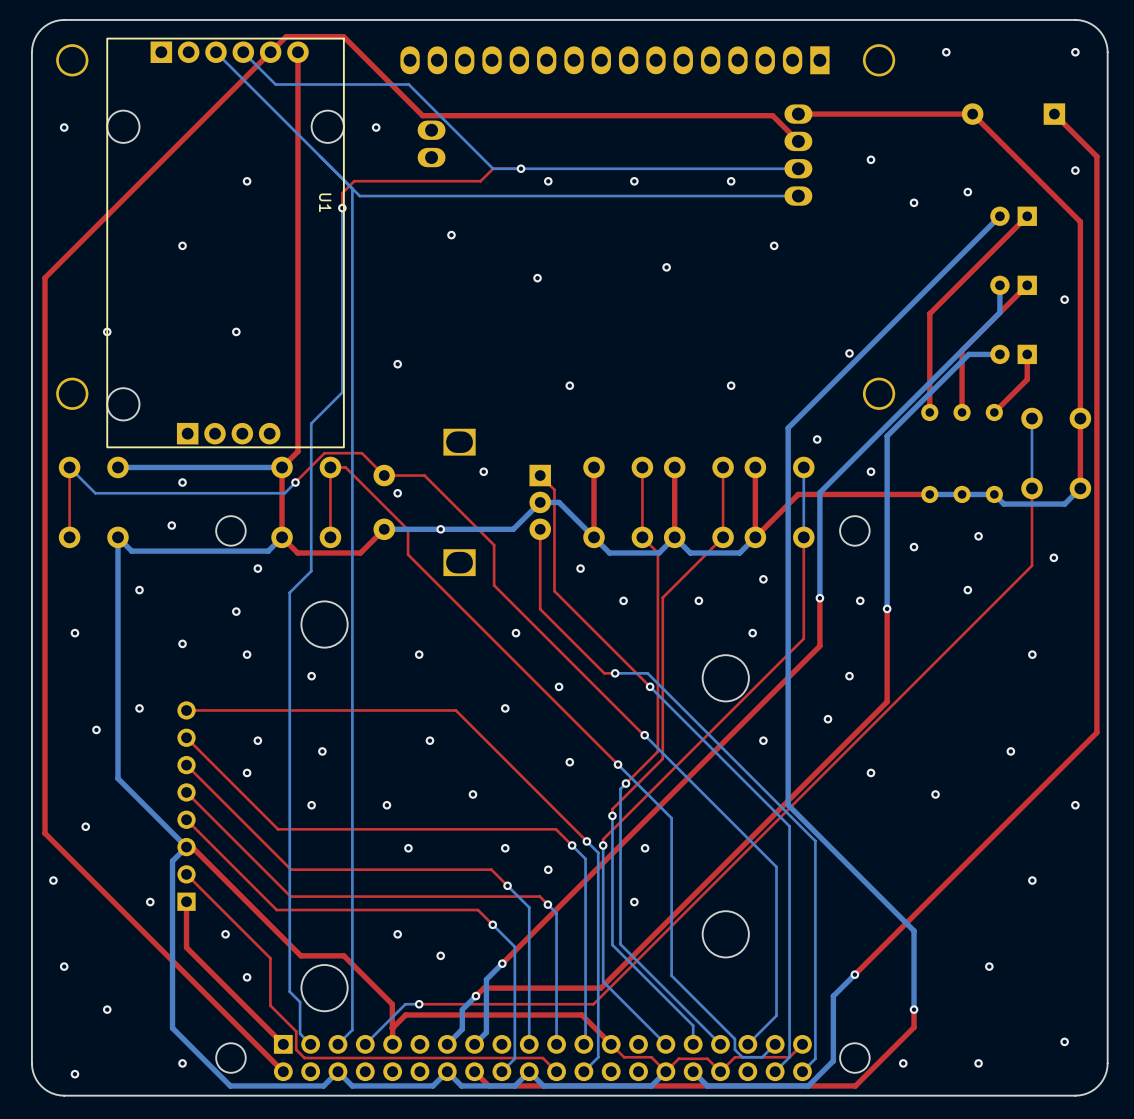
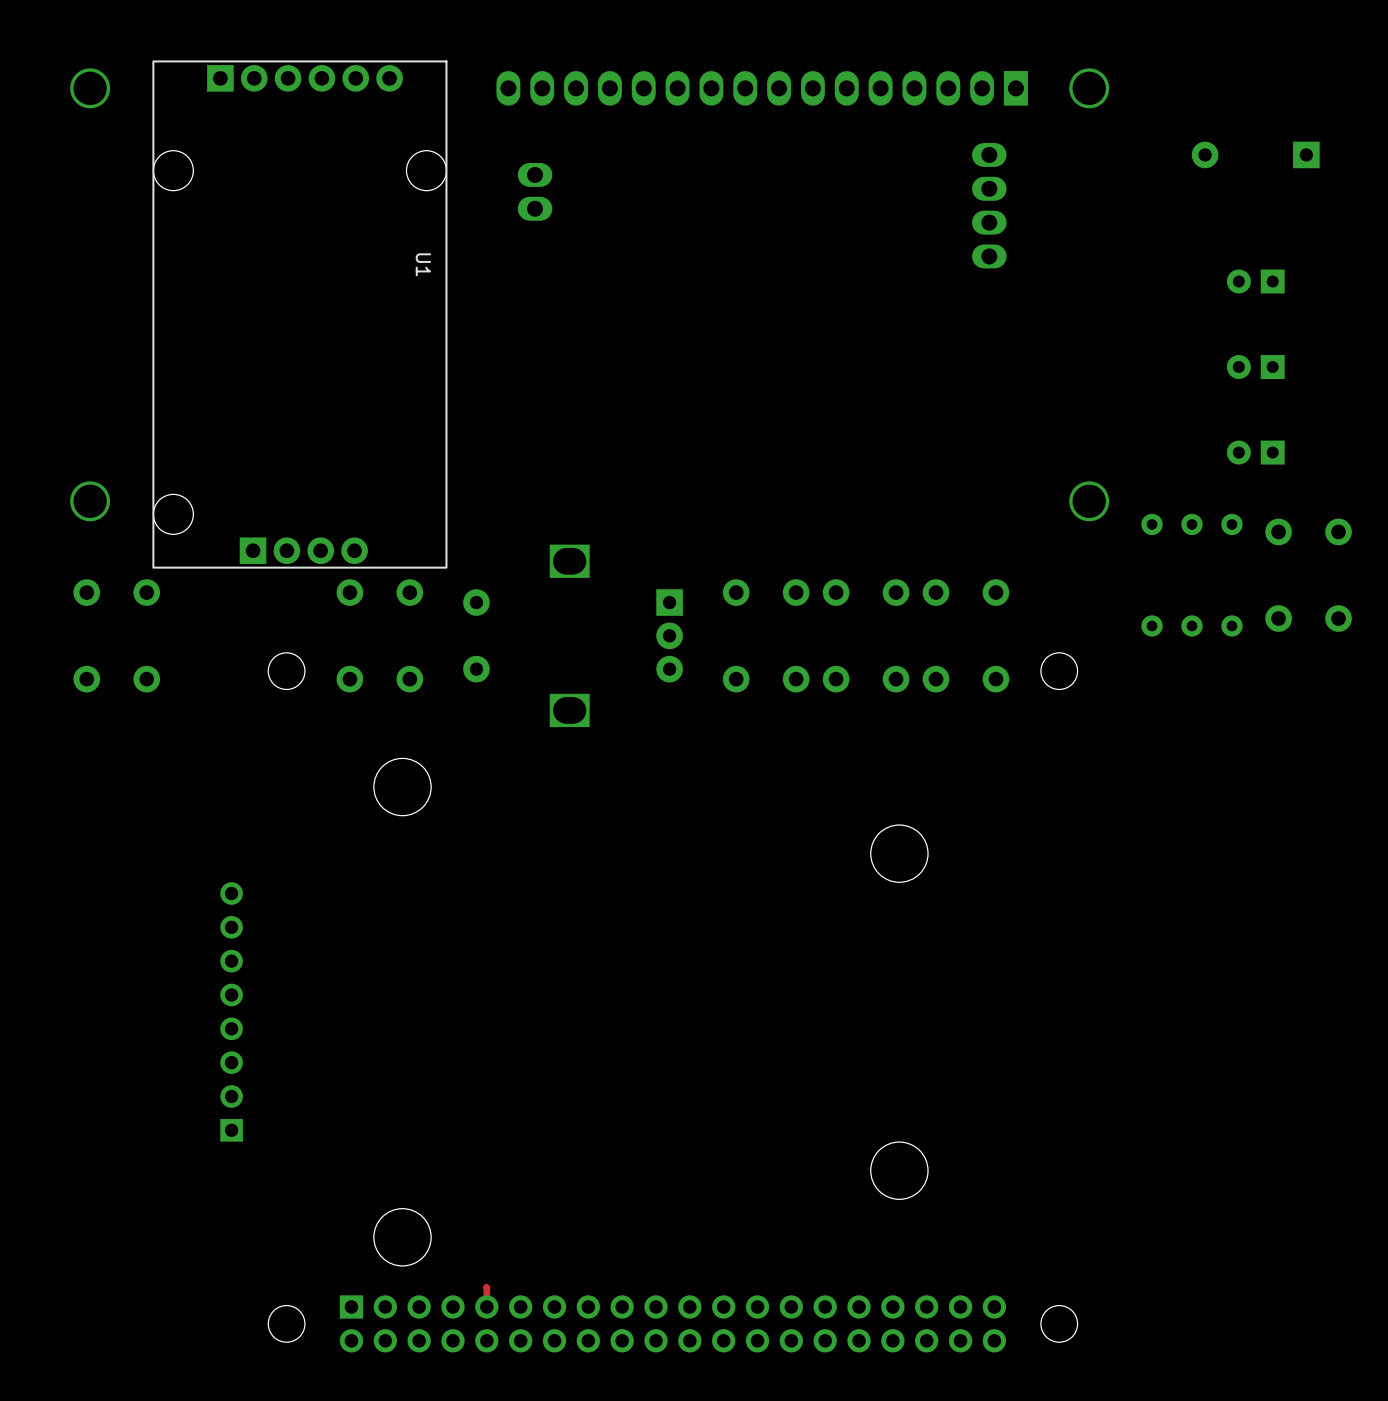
board edge: (1075, 19) (64, 19) (51, 22) (41, 29) (34, 39) (31, 52) (31, 1063) (34, 1075) (41, 1086) (51, 1093) (64, 1095) (1075, 1095) (1087, 1093) (1098, 1086) (1105, 1075) (1107, 1063) (1107, 52) (1105, 39) (1098, 29) (1087, 22) (1075, 19) -> none
bottom track: (215, 52) (359, 196) (798, 196) -> none
bottom track: (243, 52) (275, 84) (408, 84) (493, 168) (798, 168) -> none
top track: (297, 52) (297, 451) (282, 467) (282, 537) (297, 552) (360, 552) (384, 529) -> none
via: (946, 52) -> none
via: (1075, 52) -> none
top track: (798, 114) (972, 114) (1080, 221) (1080, 488) -> none
via: (64, 127) -> none
via: (376, 127) -> none
top track: (798, 141) (772, 115) (422, 115) (343, 36) (286, 36) (45, 277) (45, 833) (283, 1071) -> none
top track: (1094, 154) (1054, 114) (1096, 156) (1096, 732) (854, 974) -> none
via: (871, 159) -> none
top track: (521, 168) (493, 168) (480, 181) (354, 181) (342, 193) (342, 208) -> none
via: (521, 168) -> none
via: (1075, 170) -> none
via: (247, 181) -> none
via: (548, 181) -> none
via: (634, 181) -> none
via: (731, 181) -> none
bottom track: (352, 188) (352, 1029) (337, 1044) -> none
via: (967, 192) -> none
via: (914, 202) -> none
bottom track: (342, 208) (342, 392) (311, 423) (311, 571) (289, 592) (289, 991) (300, 1002) (300, 1033) (310, 1044) -> none
via: (342, 208) -> none
bottom track: (999, 216) (788, 428) (788, 805) (914, 930) (914, 1009) -> none
top track: (1027, 216) (929, 313) (929, 412) -> none
via: (451, 235) -> none
U1 position: (225, 242) -> (299, 314)
via: (182, 245) -> none
via: (774, 245) -> none
via: (666, 267) -> none
via: (537, 278) -> none
bottom track: (999, 285) (999, 312) (819, 492) (819, 598) -> none
top track: (1027, 285) (962, 350) (962, 412) -> none
via: (1064, 299) -> none
via: (107, 331) -> none
via: (236, 331) -> none
via: (849, 353) -> none
bottom track: (999, 354) (968, 354) (887, 436) (887, 608) -> none
top track: (1027, 354) (1027, 379) (994, 412) -> none
via: (397, 364) -> none
via: (569, 385) -> none
via: (731, 385) -> none
bottom track: (1031, 418) (1031, 488) -> none
via: (817, 439) -> none
top track: (69, 467) (69, 537) -> none
bottom track: (69, 467) (95, 493) (284, 493) (295, 482) -> none
bottom track: (282, 467) (118, 467) -> none
top track: (594, 467) (594, 537) -> none
top track: (642, 467) (642, 537) (657, 552) (657, 751) (625, 783) -> none
top track: (674, 467) (674, 537) -> none
top track: (723, 467) (723, 537) (662, 597) (662, 758) (612, 809) (612, 815) -> none
top track: (755, 467) (755, 537) (798, 494) (929, 494) -> none
bottom track: (803, 467) (803, 537) -> none
via: (483, 471) -> none
via: (871, 471) -> none
top track: (540, 475) (554, 489) (554, 591) (650, 686) -> none
via: (182, 482) -> none
top track: (295, 482) (324, 453) (361, 453) (384, 475) (424, 475) (494, 545) (494, 585) (644, 735) -> none
via: (295, 482) -> none
top track: (1031, 488) (1031, 565) (593, 1004) (419, 1004) -> none
bottom track: (1080, 488) (1064, 504) (1003, 504) (994, 494) (929, 494) -> none
via: (397, 493) -> none
via: (171, 525) -> none
bottom track: (384, 529) (513, 529) (540, 502) (559, 502) (609, 552) (659, 552) (674, 537) (690, 552) (739, 552) (755, 537) -> none
via: (440, 529) -> none
top track: (540, 529) (540, 609) (604, 673) (615, 673) -> none
via: (978, 536) -> none
bottom track: (282, 537) (268, 551) (131, 551) (118, 537) (118, 778) (186, 847) (172, 861) (172, 1028) (230, 1085) (323, 1085) (337, 1071) (352, 1085) (433, 1085) (447, 1071) (461, 1085) (514, 1085) (529, 1071) (543, 1085) (651, 1085) (665, 1071) -> none
top track: (330, 537) (330, 467) (345, 467) (408, 529) (408, 554) (618, 764) -> none
top track: (803, 537) (803, 638) (603, 839) (603, 845) -> none
via: (914, 547) -> none
via: (1053, 557) -> none
via: (257, 568) -> none
via: (580, 568) -> none
via: (763, 579) -> none
via: (139, 590) -> none
via: (967, 590) -> none
top track: (819, 598) (819, 646) (502, 963) -> none
via: (819, 598) -> none
via: (623, 600) -> none
via: (698, 600) -> none
via: (860, 600) -> none
top track: (887, 608) (887, 701) (600, 988) (483, 988) (475, 996) -> none
via: (887, 608) -> none
via: (236, 611) -> none
via: (74, 633) -> none
via: (516, 633) -> none
via: (752, 633) -> none
via: (182, 643) -> none
via: (247, 654) -> none
via: (419, 654) -> none
via: (1032, 654) -> none
bottom track: (615, 673) (647, 673) (815, 841) (815, 1058) (802, 1071) -> none
via: (615, 673) -> none
via: (311, 676) -> none
via: (849, 676) -> none
via: (559, 686) -> none
bottom track: (650, 686) (789, 826) (789, 1057) (775, 1071) -> none
via: (650, 686) -> none
via: (139, 708) -> none
via: (505, 708) -> none
top track: (186, 710) (455, 710) (586, 841) -> none
via: (827, 719) -> none
via: (96, 729) -> none
bottom track: (644, 735) (776, 866) (776, 1015) (747, 1044) -> none
via: (644, 735) -> none
top track: (186, 737) (278, 829) (555, 829) (572, 845) -> none
via: (257, 740) -> none
via: (429, 740) -> none
via: (763, 740) -> none
via: (322, 751) -> none
via: (1010, 751) -> none
via: (569, 762) -> none
bottom track: (618, 764) (671, 818) (671, 975) (734, 1039) (734, 1049) (742, 1057) (762, 1057) (775, 1044) -> none
via: (618, 764) -> none
top track: (186, 765) (291, 869) (491, 869) (507, 885) -> none
via: (247, 772) -> none
via: (871, 772) -> none
bottom track: (625, 783) (620, 788) (620, 944) (720, 1044) -> none
via: (625, 783) -> none
top track: (186, 792) (290, 896) (539, 896) (547, 904) -> none
via: (472, 794) -> none
via: (935, 794) -> none
via: (311, 805) -> none
via: (386, 805) -> none
via: (1075, 805) -> none
bottom track: (612, 815) (612, 944) (693, 1025) (693, 1044) -> none
via: (612, 815) -> none
top track: (186, 819) (276, 910) (477, 910) (492, 924) -> none
via: (85, 826) -> none
bottom track: (586, 841) (598, 852) (598, 1057) (583, 1071) -> none
via: (586, 841) -> none
bottom track: (572, 845) (585, 858) (585, 1042) (583, 1044) -> none
via: (572, 845) -> none
bottom track: (603, 845) (603, 981) (665, 1044) -> none
via: (603, 845) -> none
top track: (186, 847) (192, 847) (300, 955) (343, 955) (392, 1004) (392, 1028) (405, 1015) (581, 1015) (624, 1057) (651, 1057) (665, 1071) (678, 1058) (707, 1058) (720, 1071) (734, 1057) (789, 1057) (802, 1044) -> none
via: (408, 848) -> none
via: (505, 848) -> none
via: (645, 848) -> none
via: (548, 869) -> none
top track: (186, 874) (270, 958) (270, 1005) (296, 1031) (296, 1049) (304, 1058) (542, 1058) (556, 1071) -> none
via: (53, 880) -> none
via: (1032, 880) -> none
bottom track: (507, 885) (529, 907) (529, 1044) -> none
via: (507, 885) -> none
top track: (186, 901) (186, 947) (283, 1044) (275, 1044) -> none
via: (150, 902) -> none
via: (634, 902) -> none
bottom track: (547, 904) (556, 913) (556, 1044) -> none
via: (547, 904) -> none
bottom track: (492, 924) (514, 946) (514, 1058) (501, 1071) -> none
via: (492, 924) -> none
via: (225, 934) -> none
via: (397, 934) -> none
via: (440, 955) -> none
bottom track: (502, 963) (486, 979) (486, 1032) (474, 1044) -> none
via: (502, 963) -> none
via: (64, 966) -> none
via: (989, 966) -> none
bottom track: (854, 974) (833, 996) (833, 1060) (808, 1085) (707, 1085) (693, 1071) -> none
via: (854, 974) -> none
via: (247, 977) -> none
bottom track: (475, 996) (462, 1009) (462, 1029) (447, 1044) -> none
via: (475, 996) -> none
bottom track: (419, 1004) (405, 1004) (365, 1044) -> none
via: (419, 1004) -> none
via: (107, 1009) -> none
top track: (914, 1009) (914, 1027) (855, 1085) (488, 1085) (474, 1071) -> none
via: (914, 1009) -> none
via: (1064, 1041) -> none
via: (182, 1063) -> none
via: (903, 1063) -> none
via: (978, 1063) -> none
via: (74, 1074) -> none

